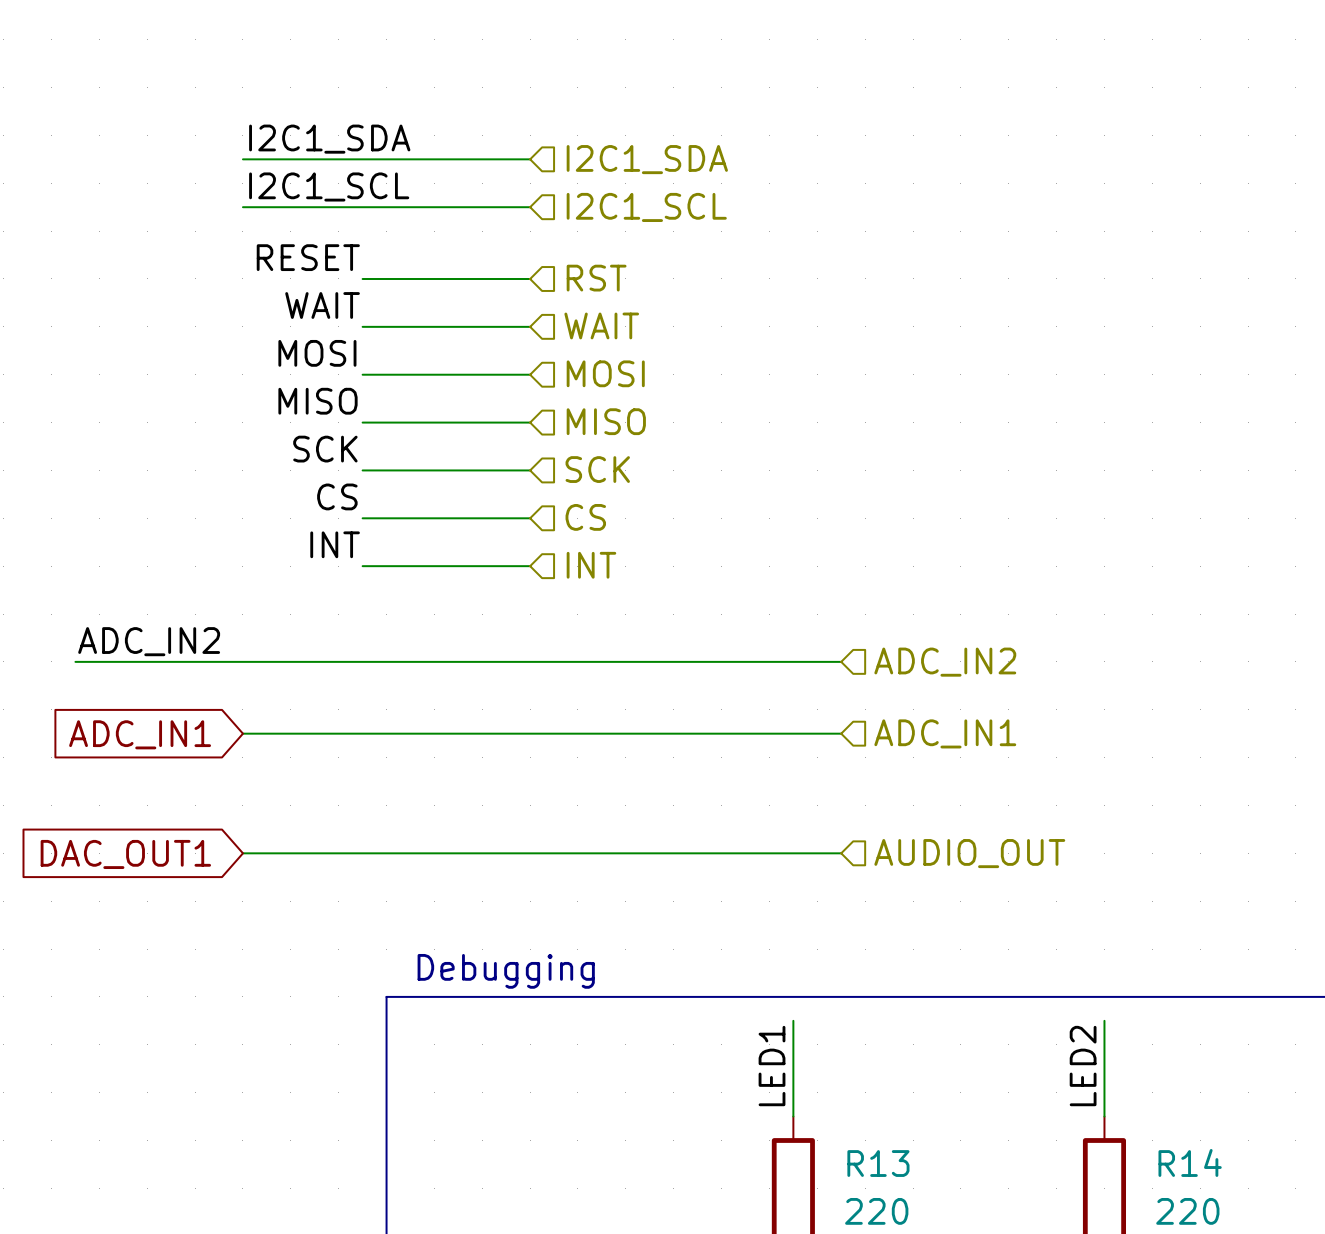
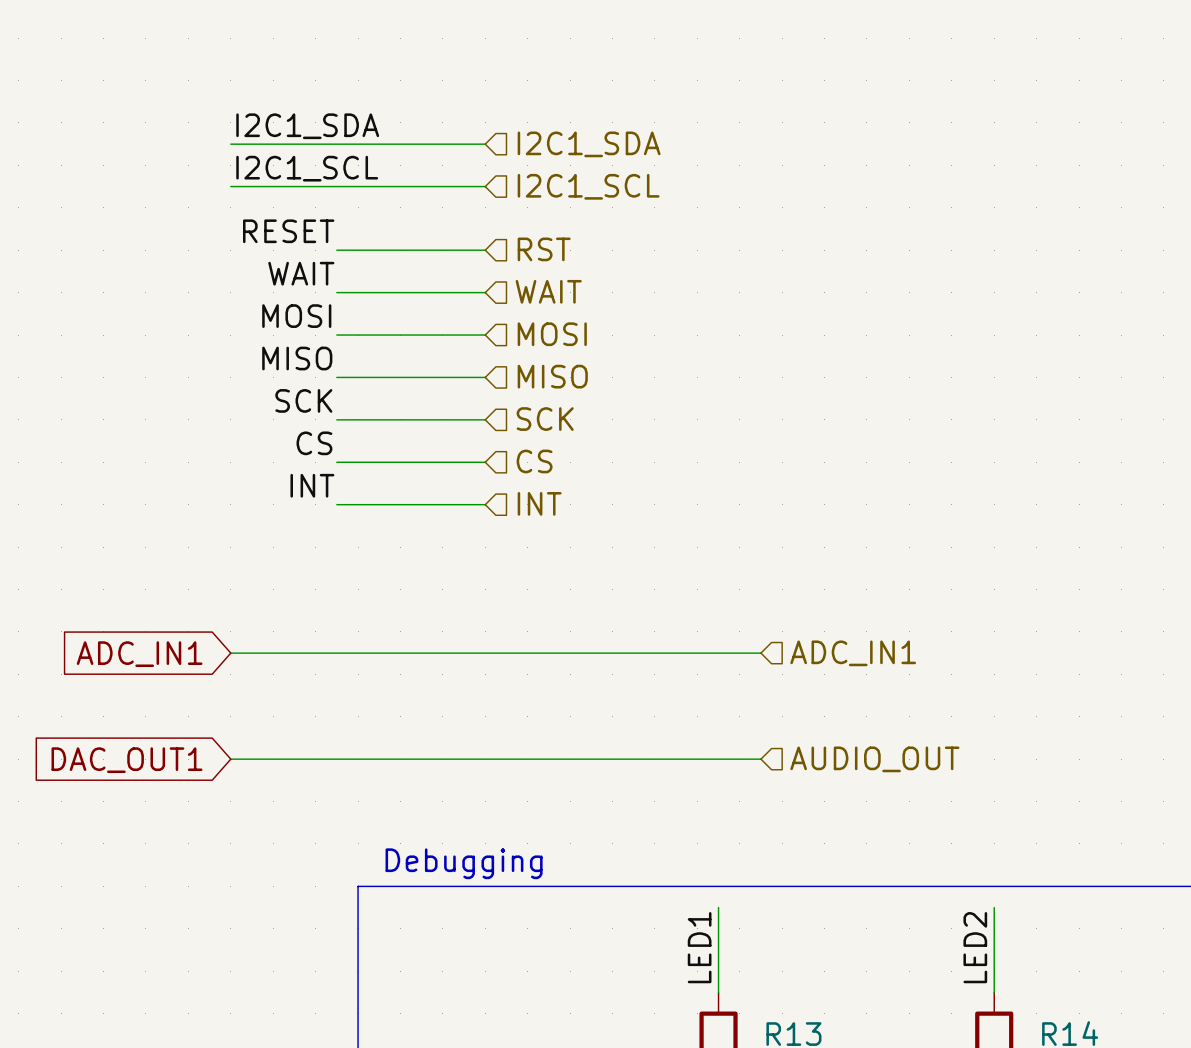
label: ADC_IN2 (149, 641) -> none
wire: (75, 661) (841, 661) -> none
hierarchical label: ADC_IN2 (945, 662) -> none

